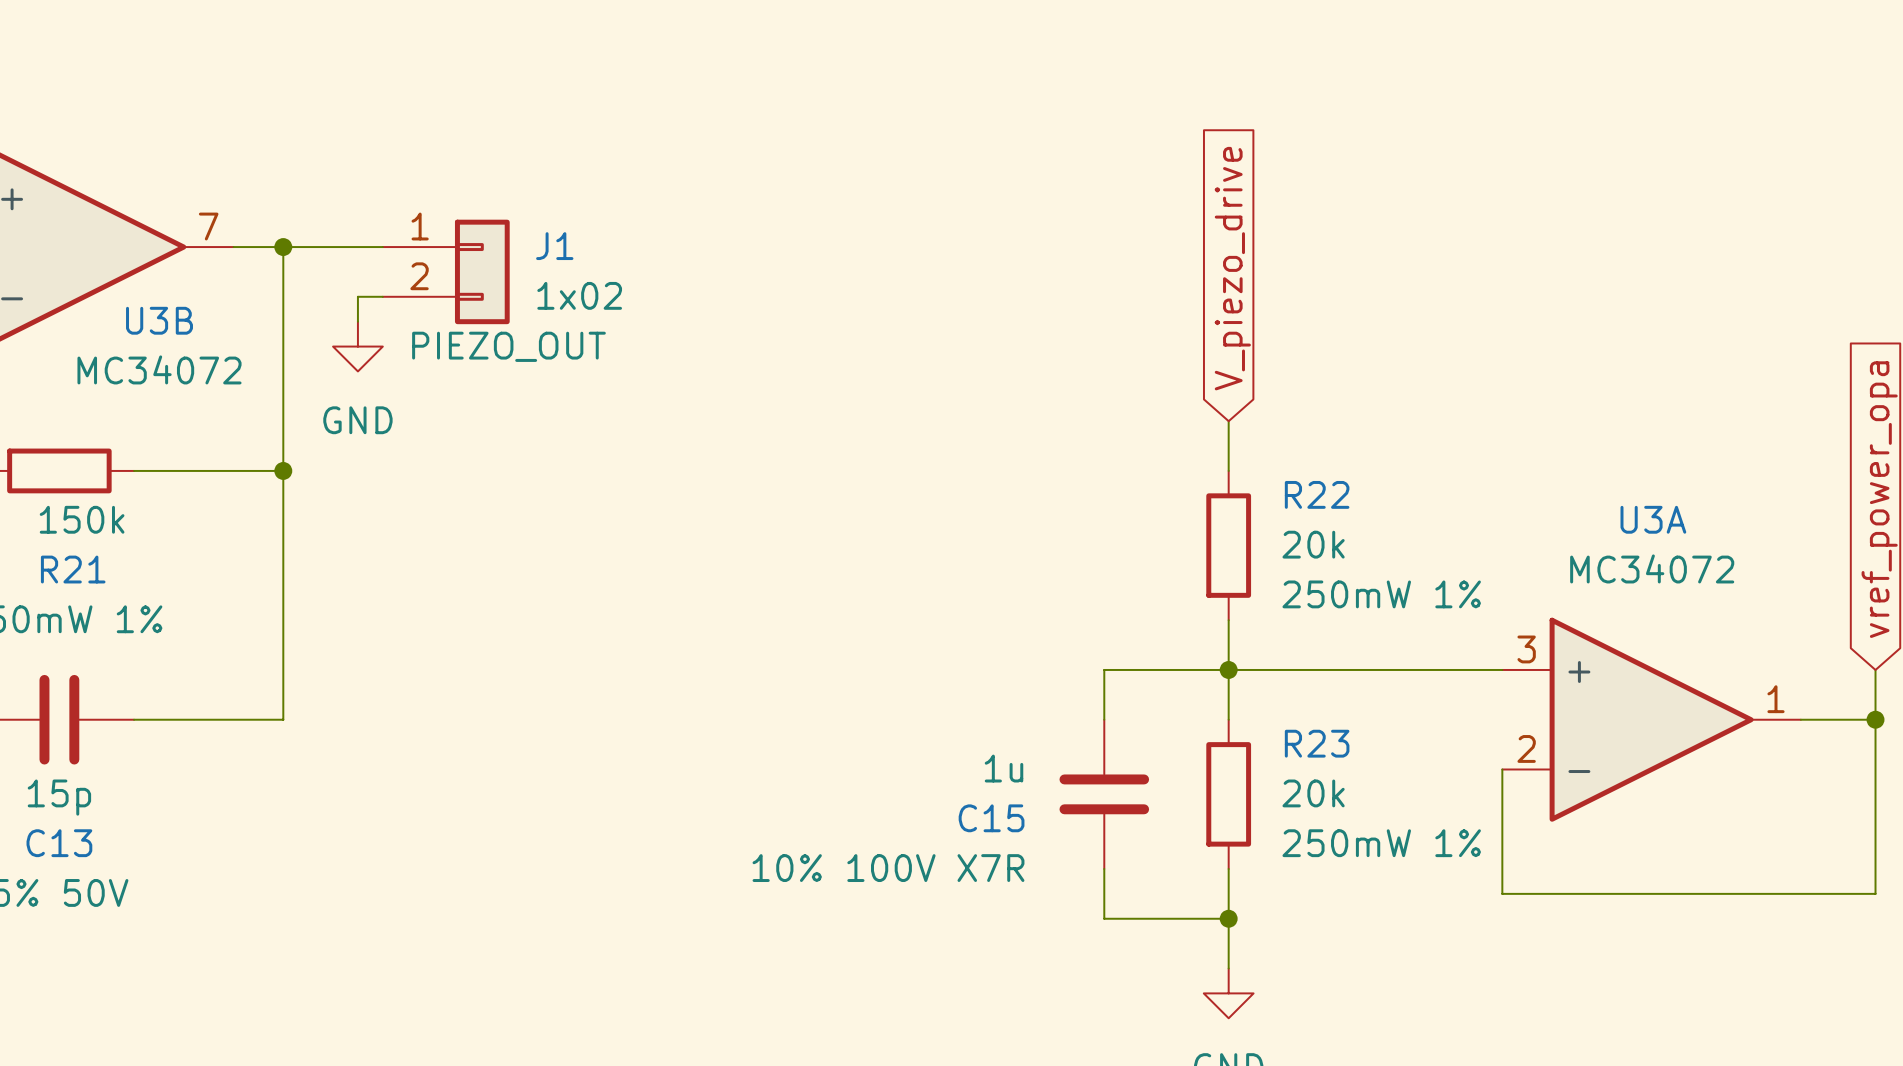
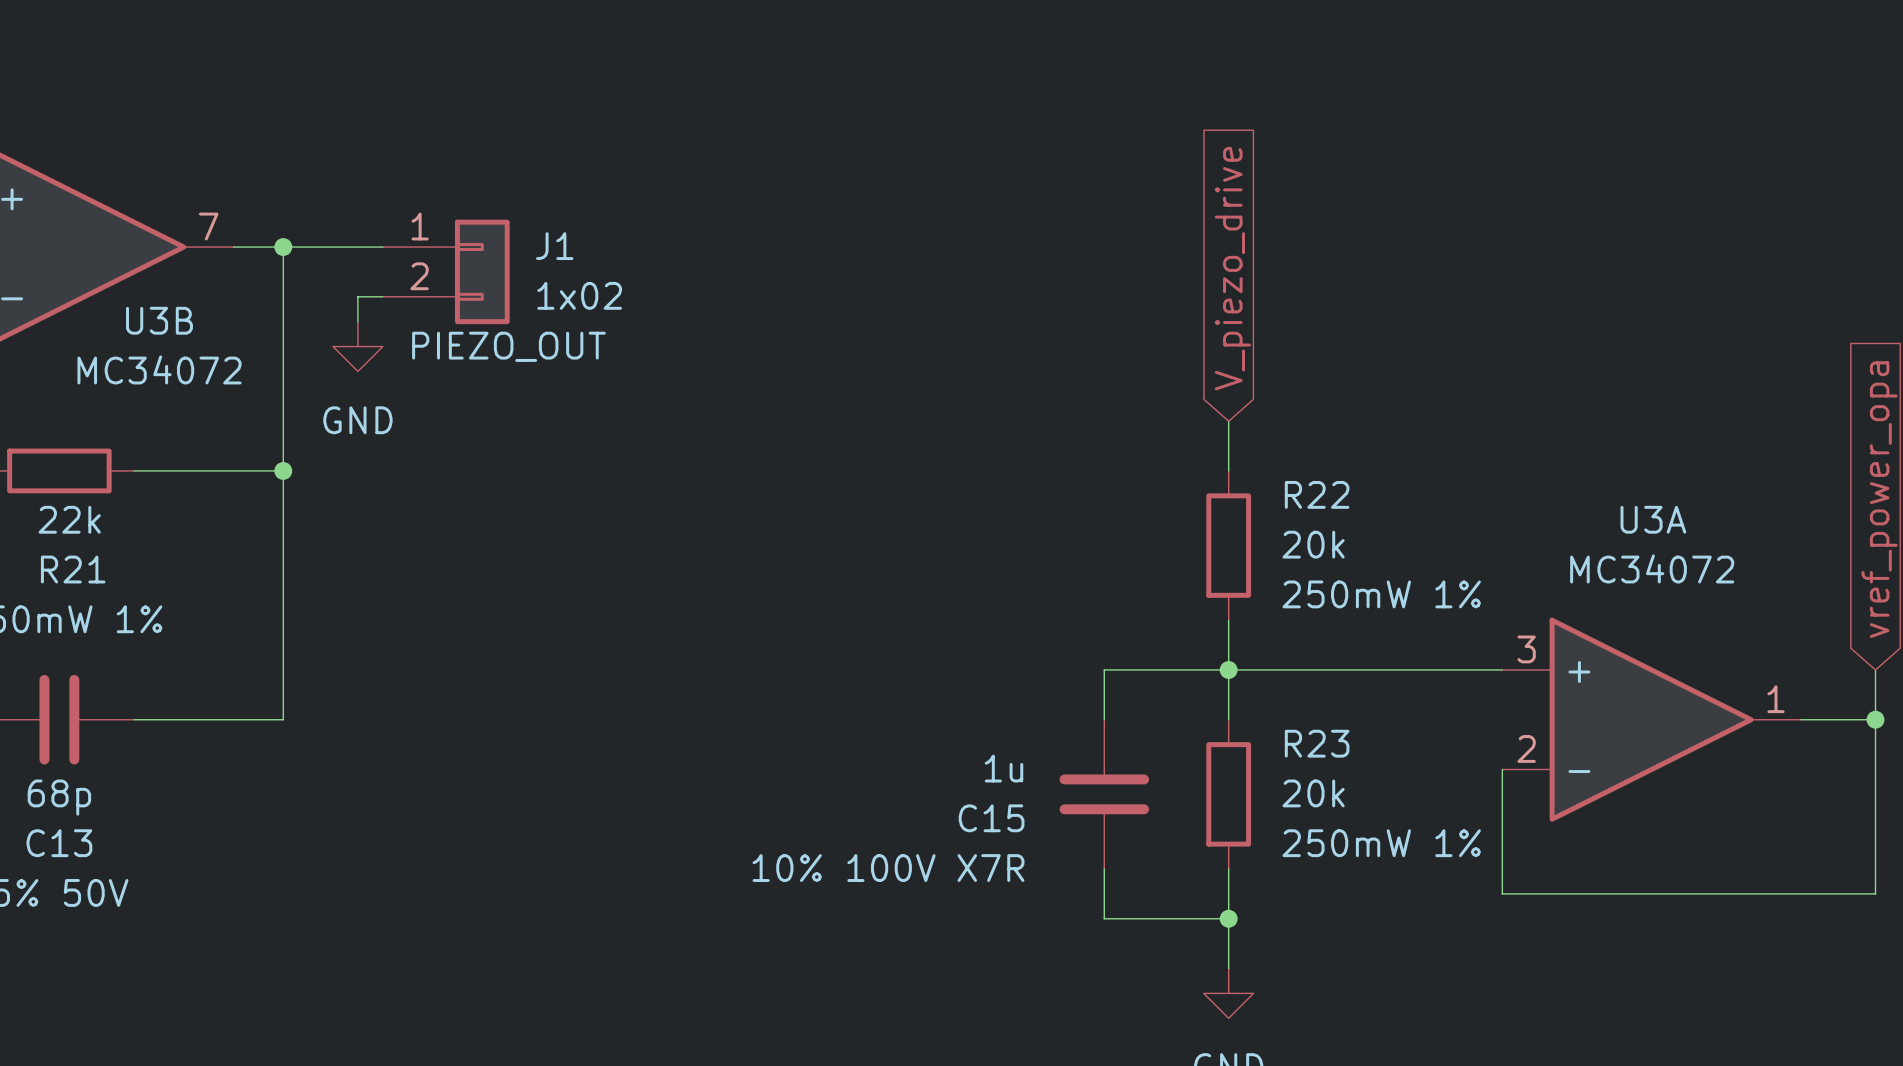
R21 value: 150k (82, 519) -> 22k (69, 519)
C13 value: 15p (59, 797) -> 68p (59, 797)

